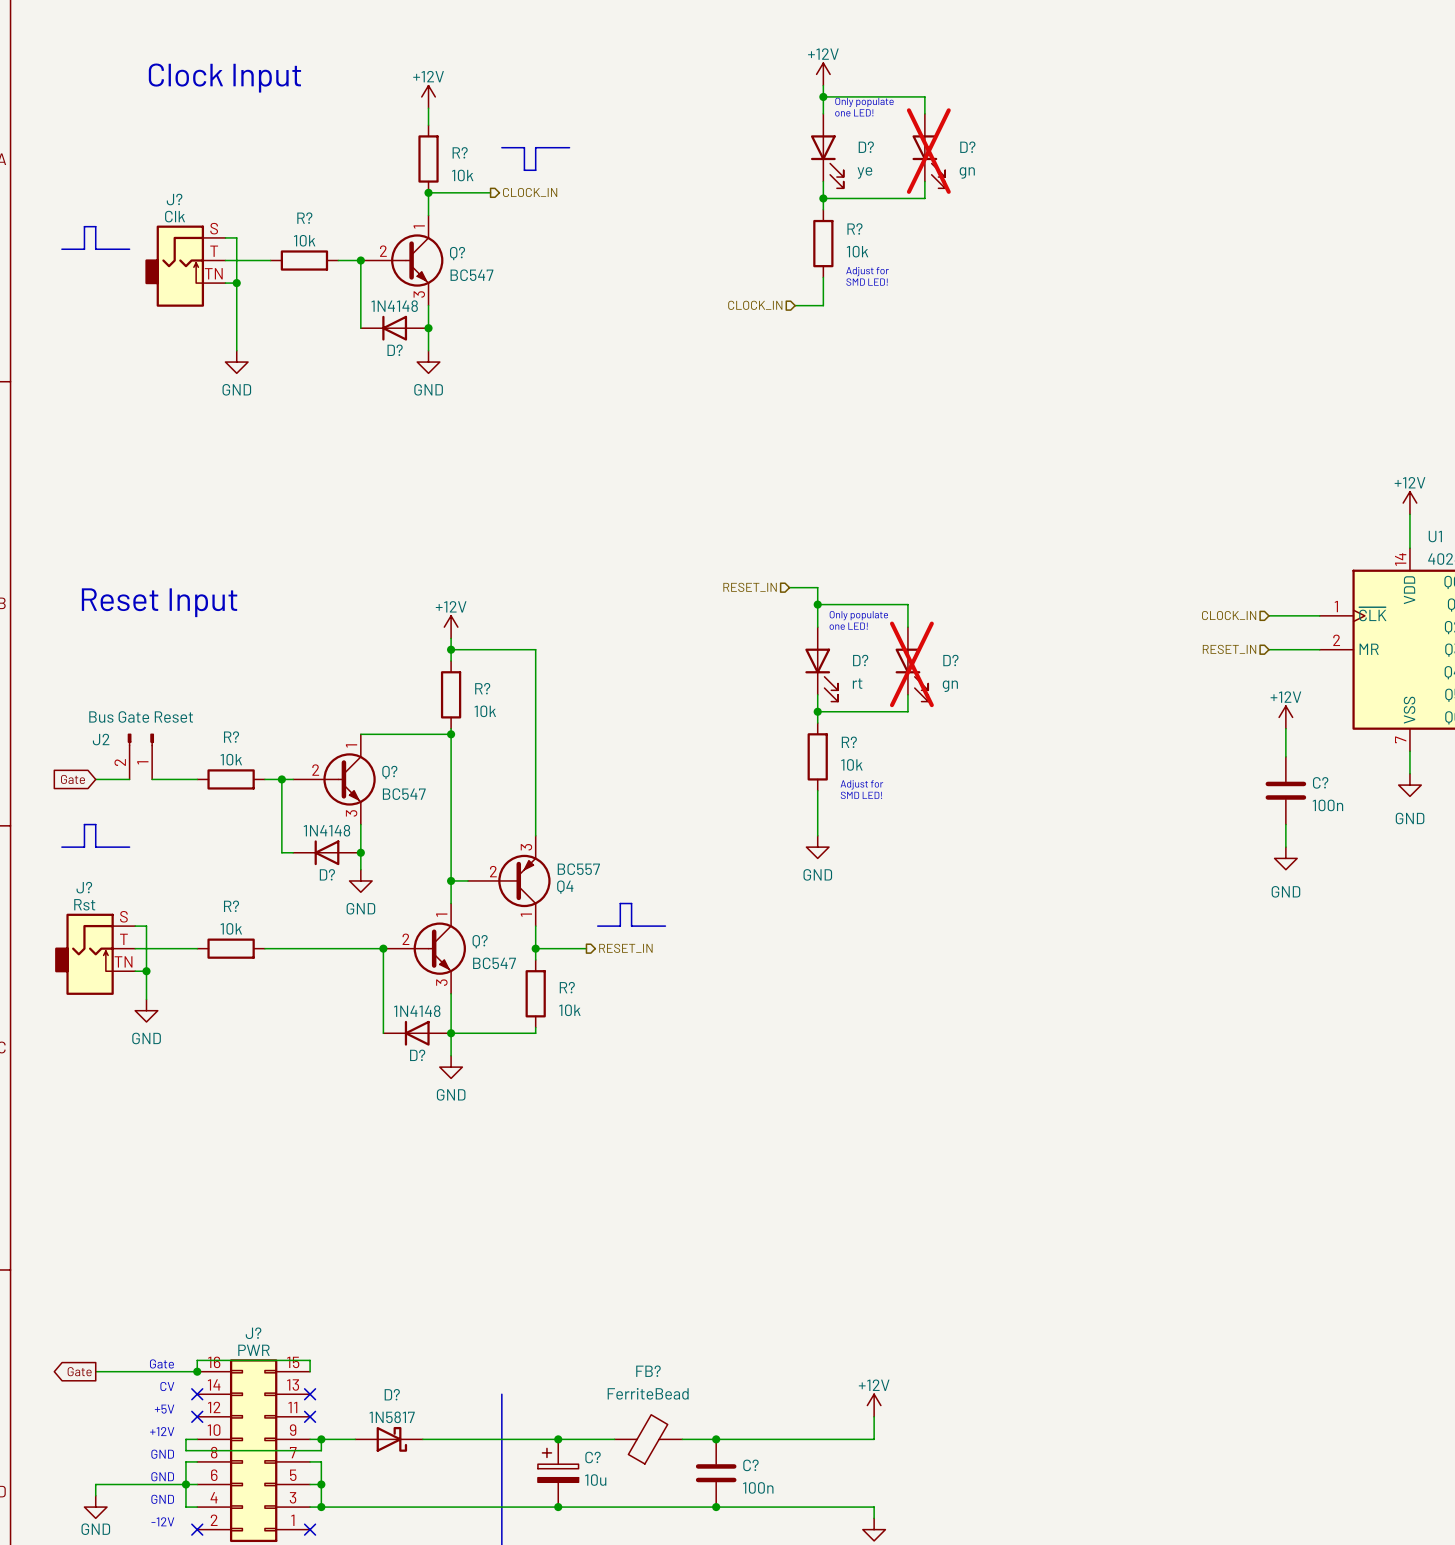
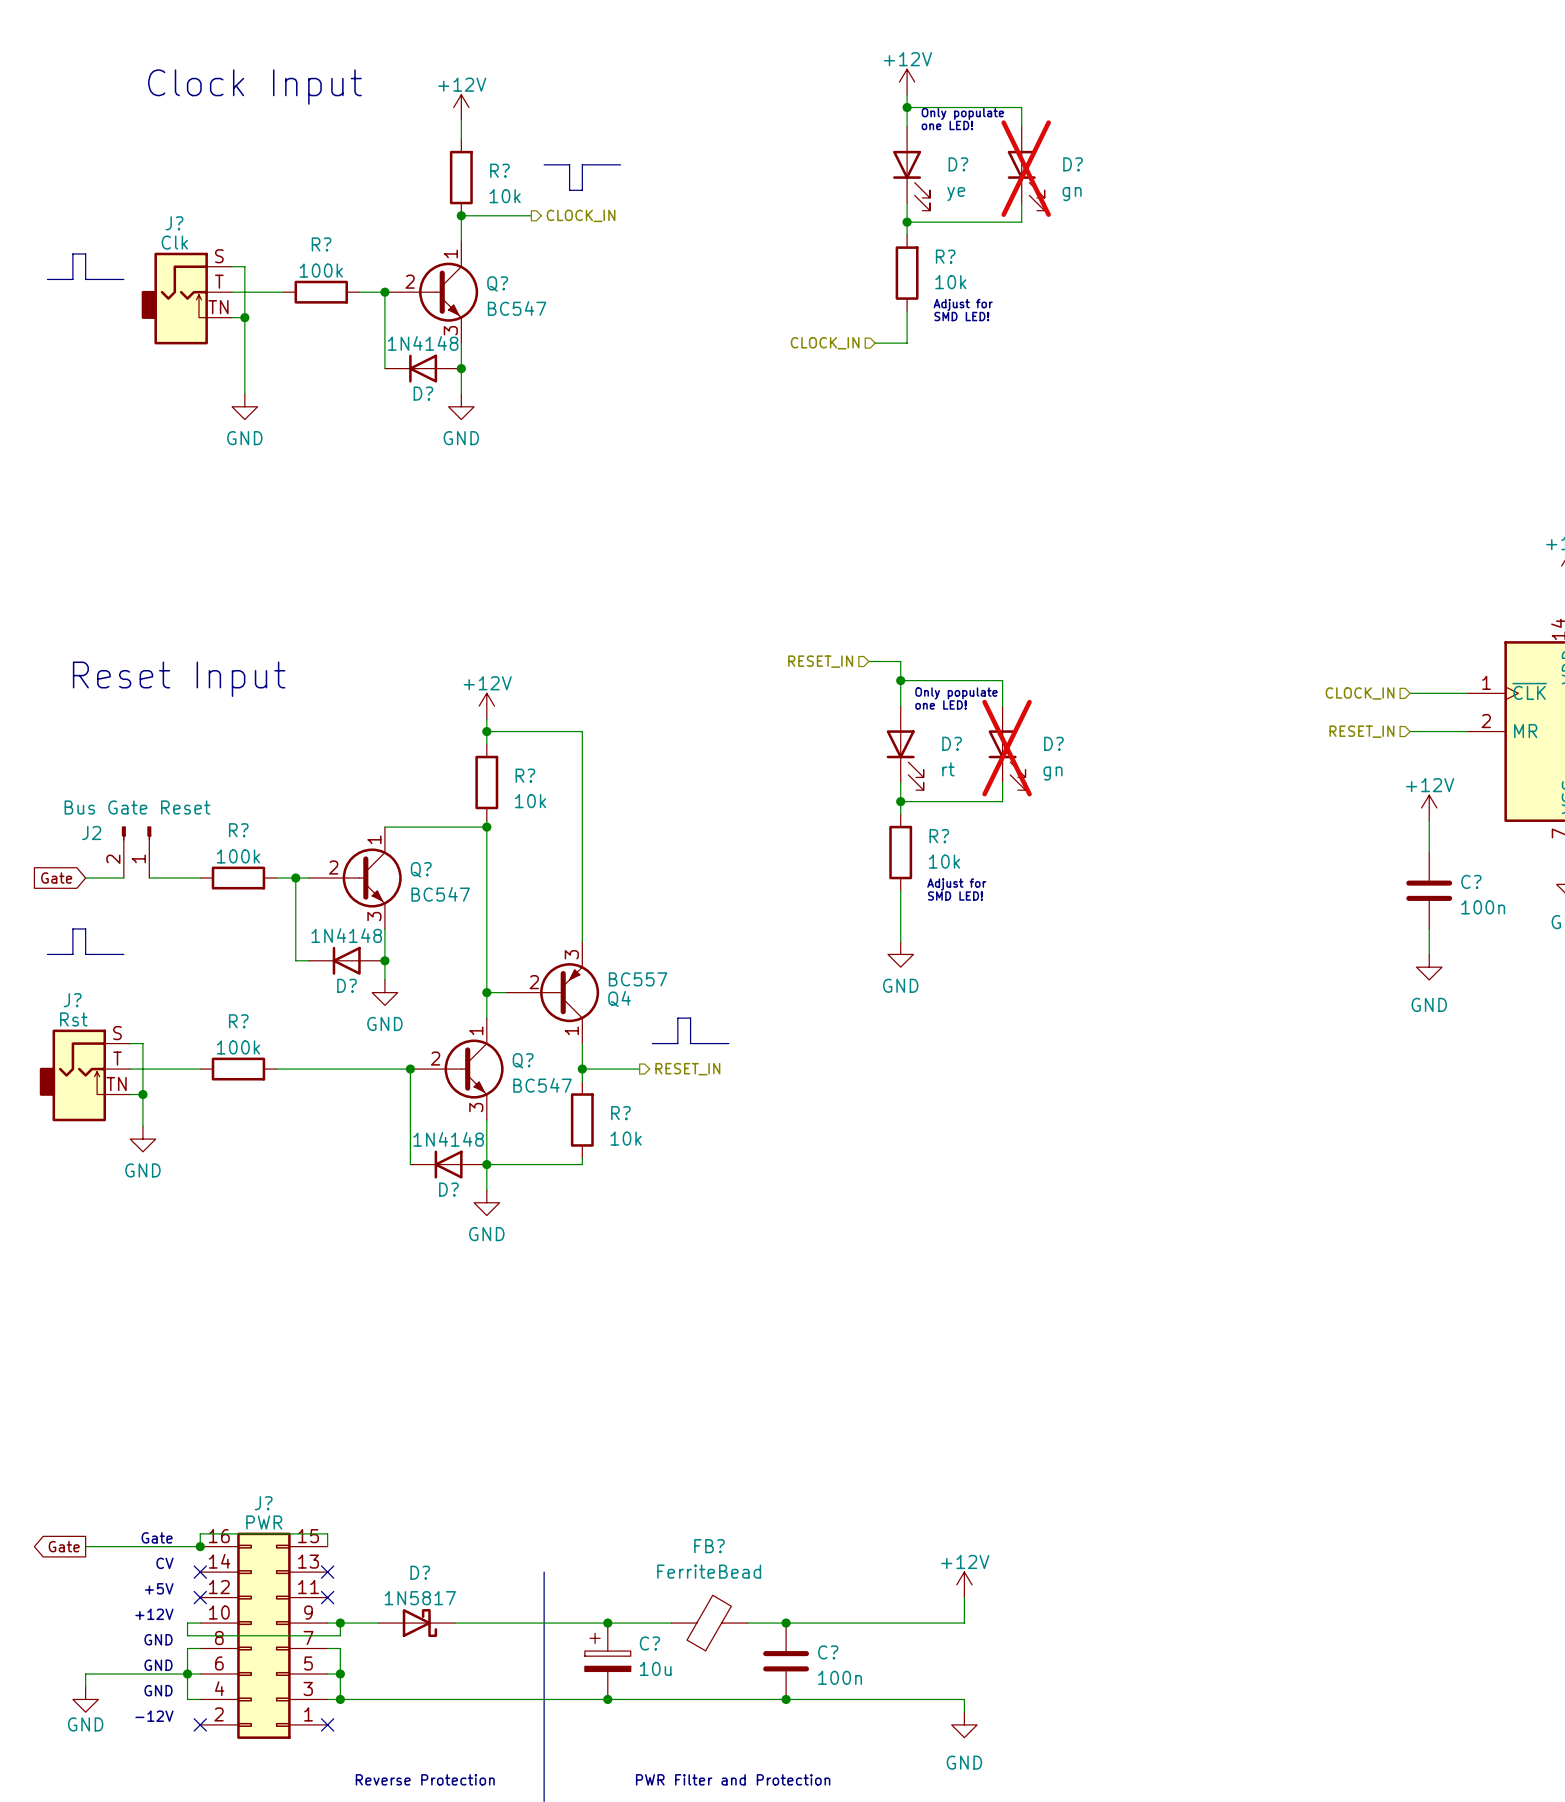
R? value: 10k (304, 240) -> 100k (321, 270)
R? value: 10k (231, 759) -> 100k (238, 856)
R? value: 10k (231, 928) -> 100k (238, 1047)

